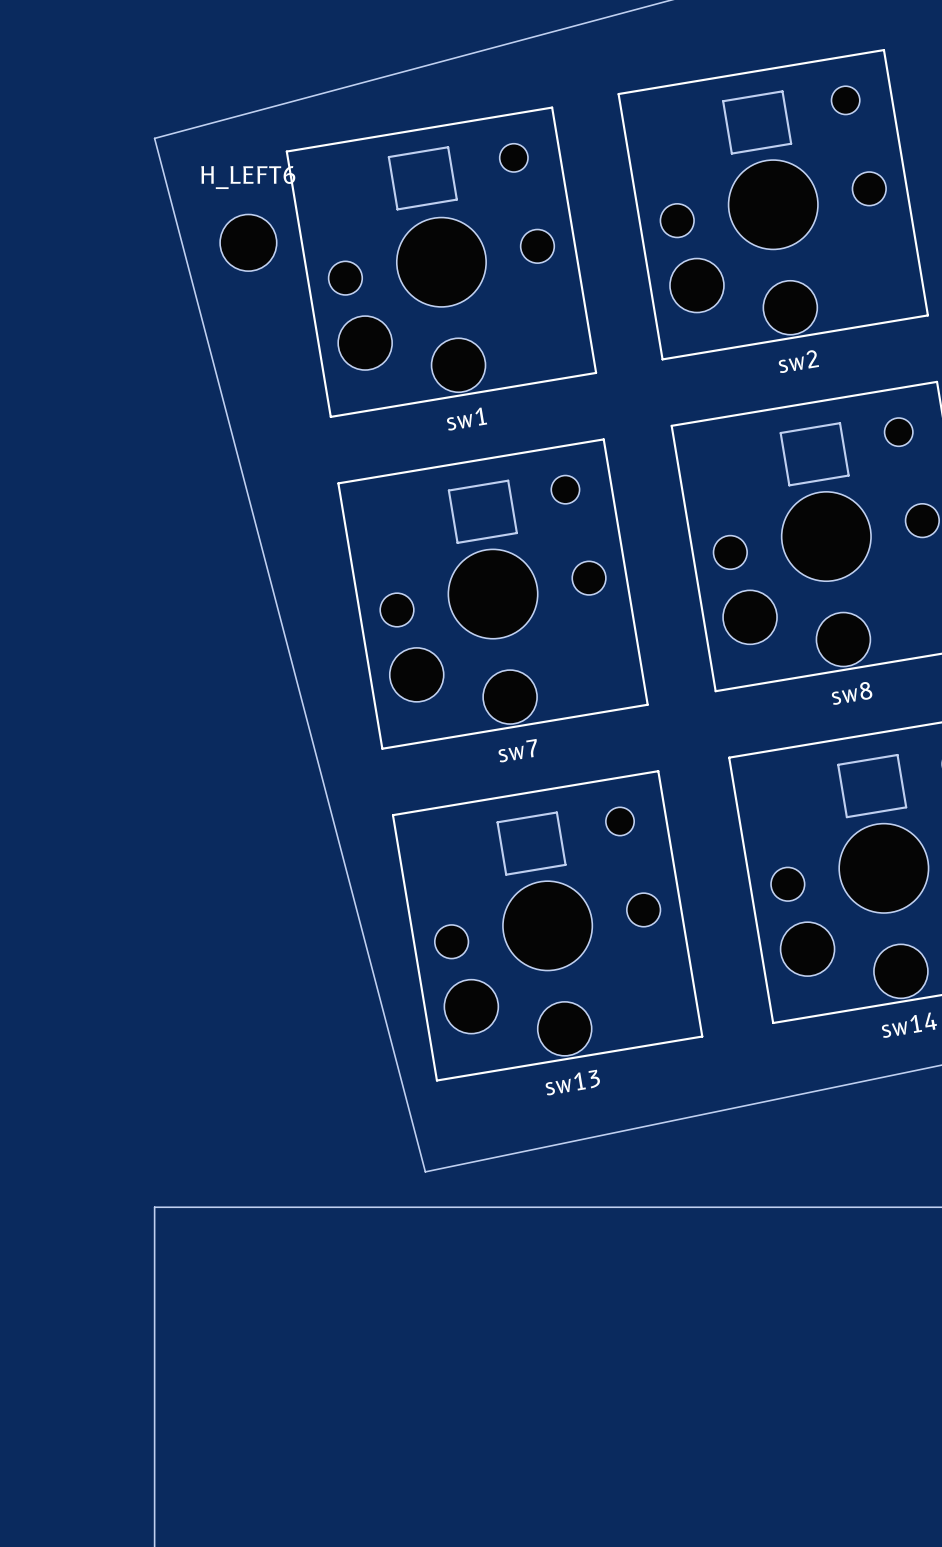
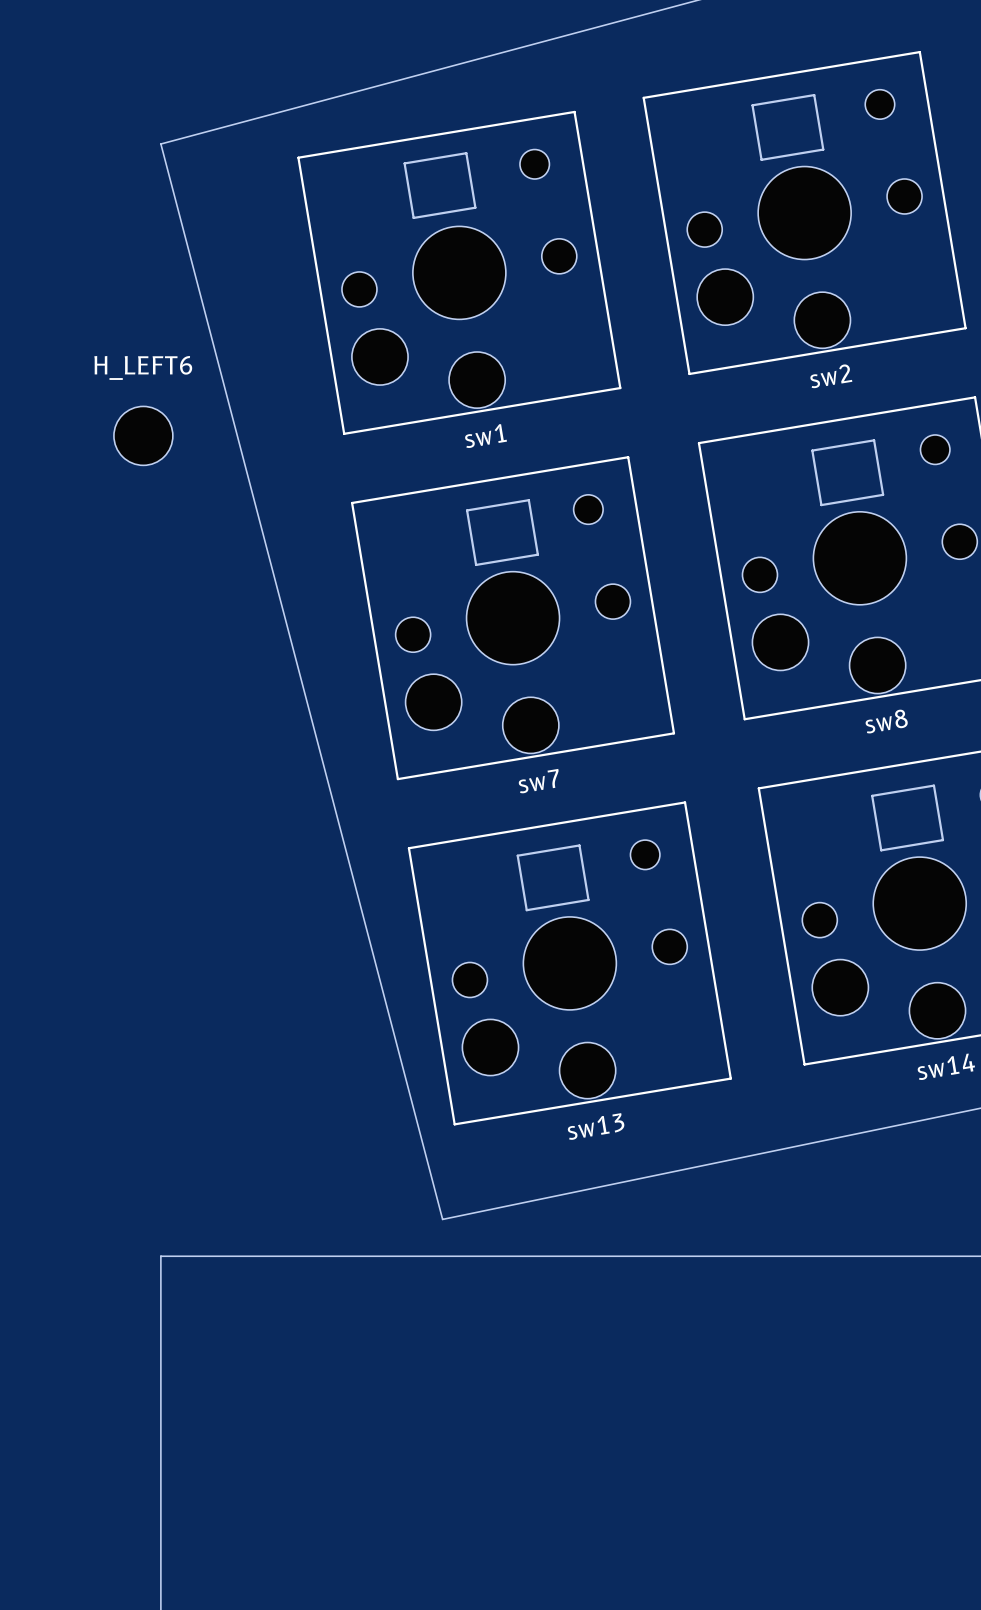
H_LEFT6 position: (248, 242) -> (143, 435)

